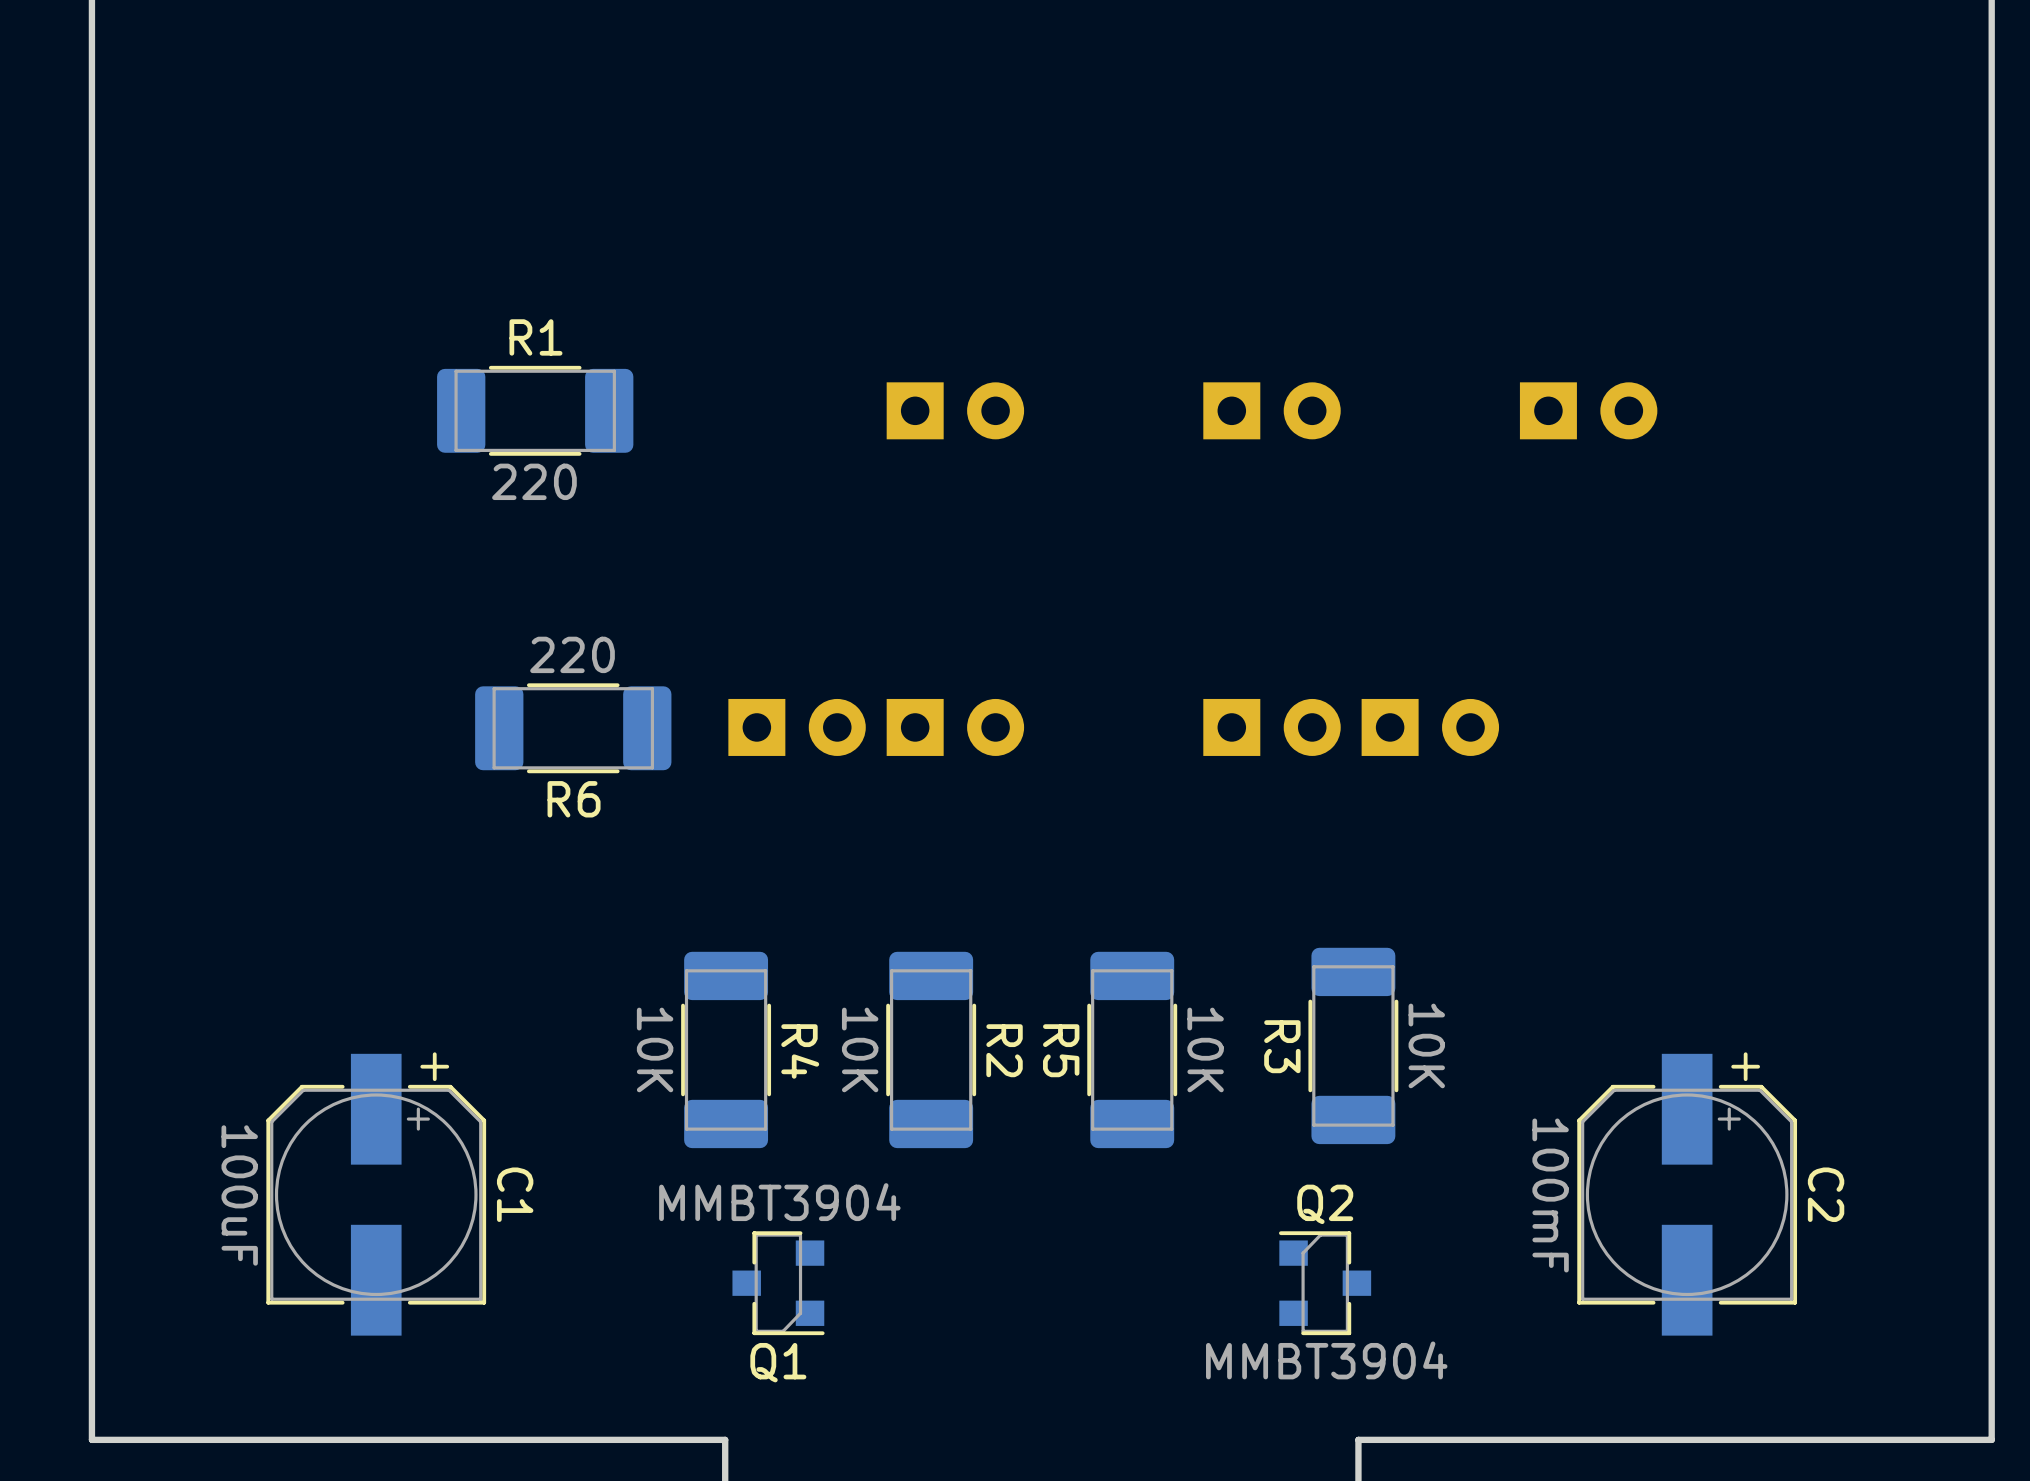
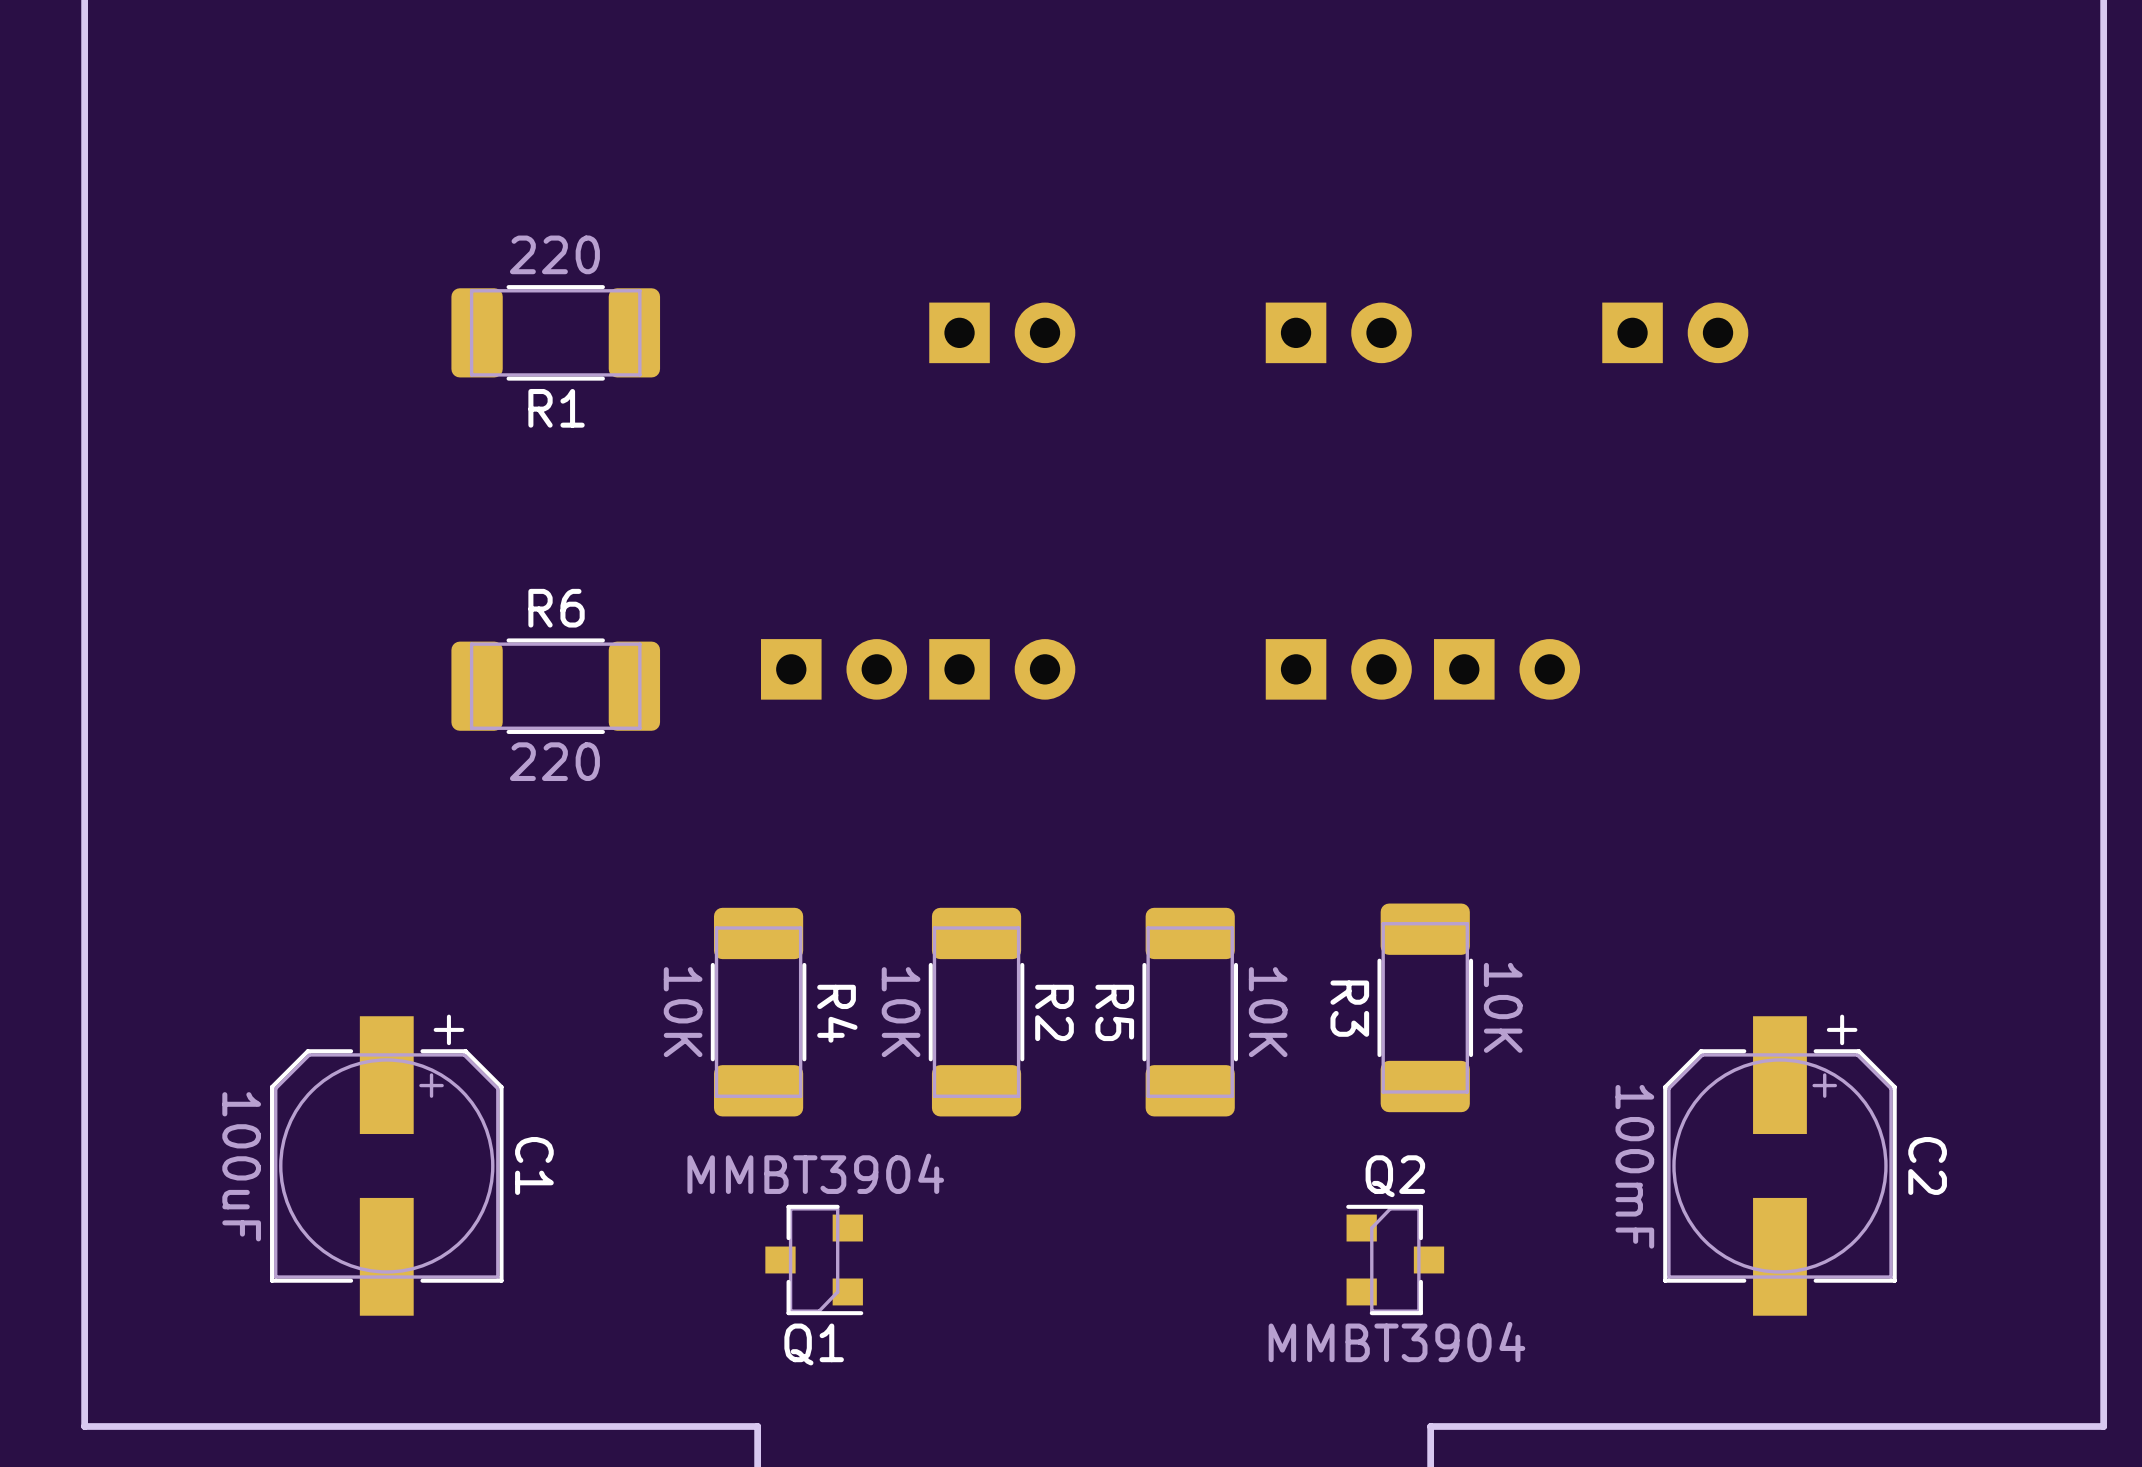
R1 name position: R1 (535, 337) -> R1 (556, 408)
R1 value position: 220 (534, 481) -> 220 (554, 254)
R6 value position: 220 (572, 654) -> 220 (554, 761)
R6 position: (573, 728) -> (555, 686)
R6 name position: R6 (574, 799) -> R6 (556, 608)

